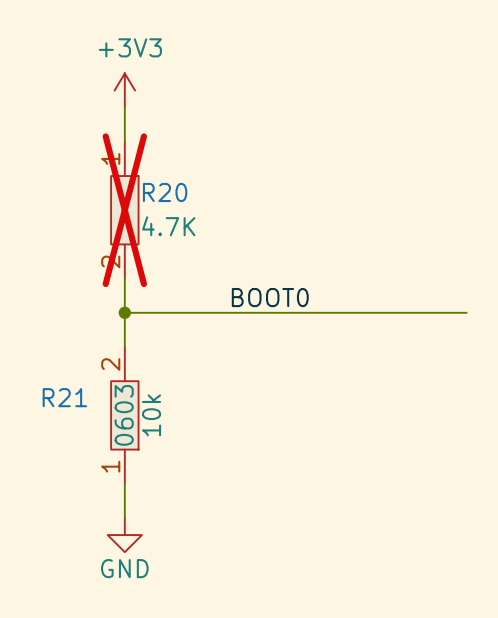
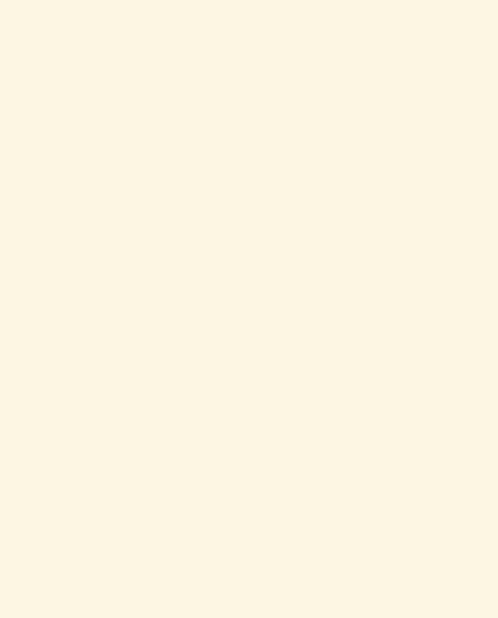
power symbol: +3V3 (124, 90) -> none
wire: (124, 107) (124, 141) -> none
R20: (124, 210) -> none
wire: (124, 278) (124, 347) -> none
label: BOOT0 (270, 297) -> none
wire: (124, 312) (466, 312) -> none
junction: (124, 312) -> none
R21: (124, 415) -> none
wire: (124, 483) (124, 517) -> none
power symbol: GND (124, 535) -> none

